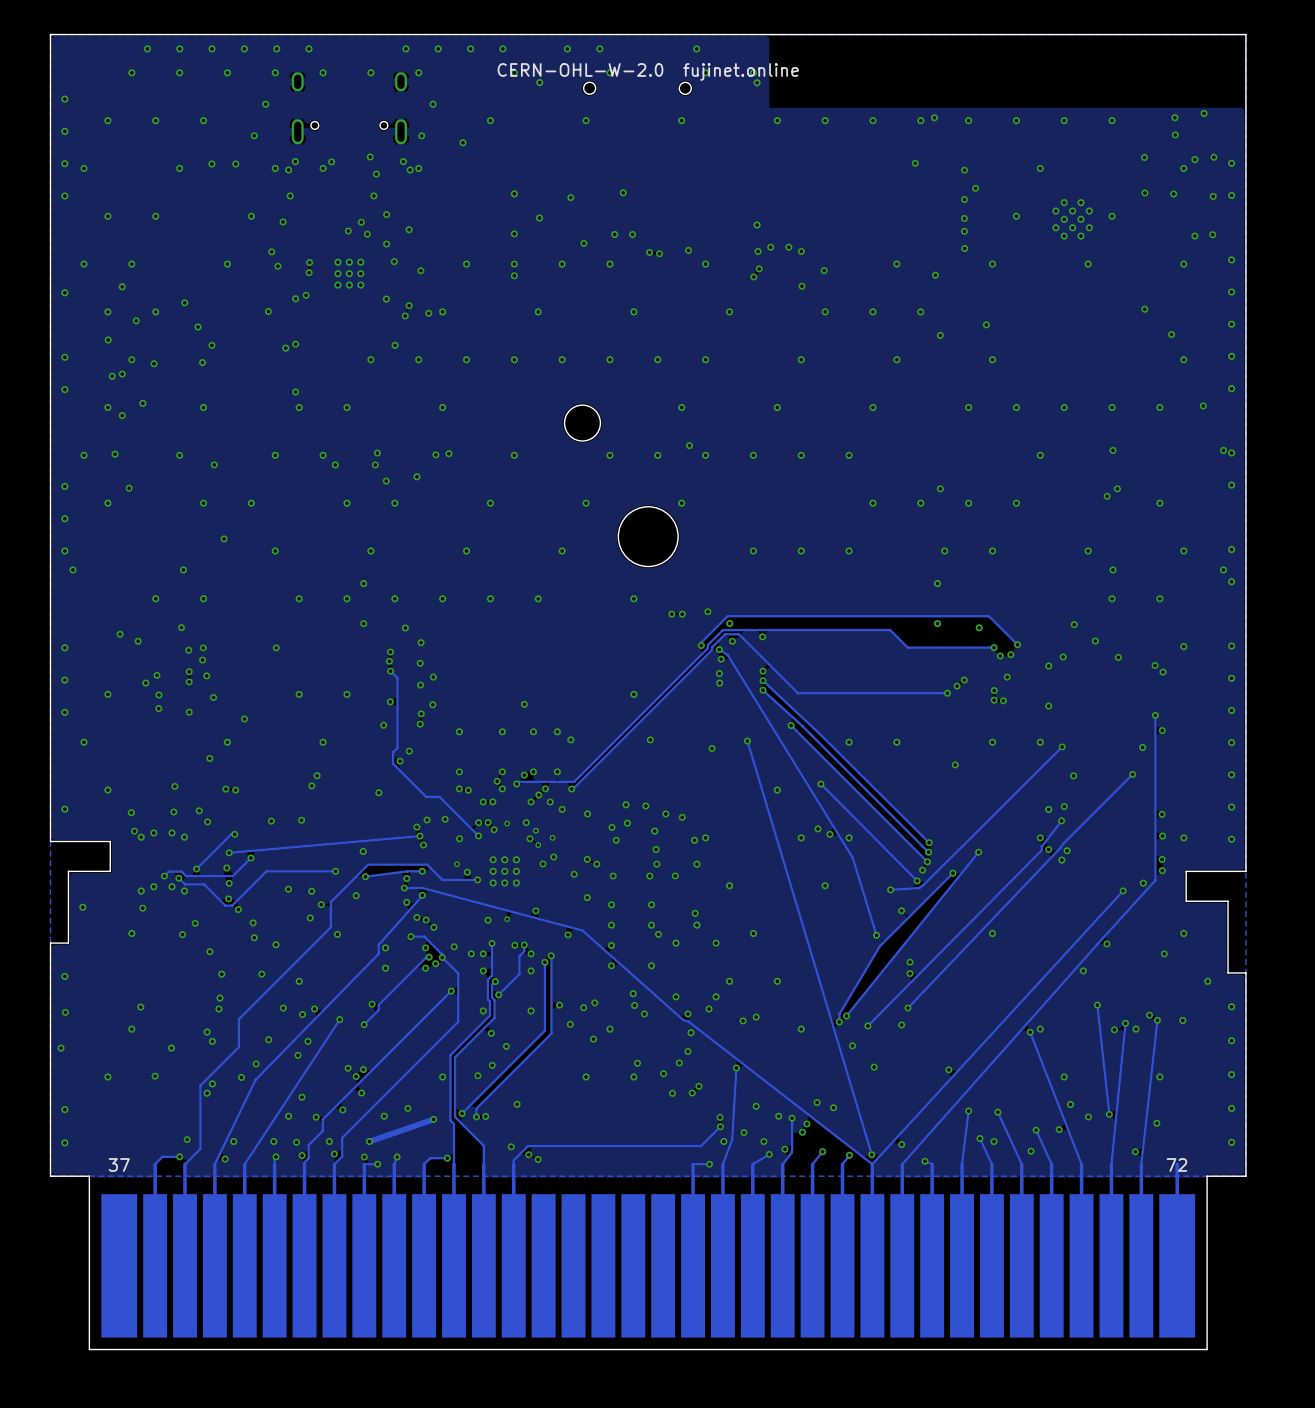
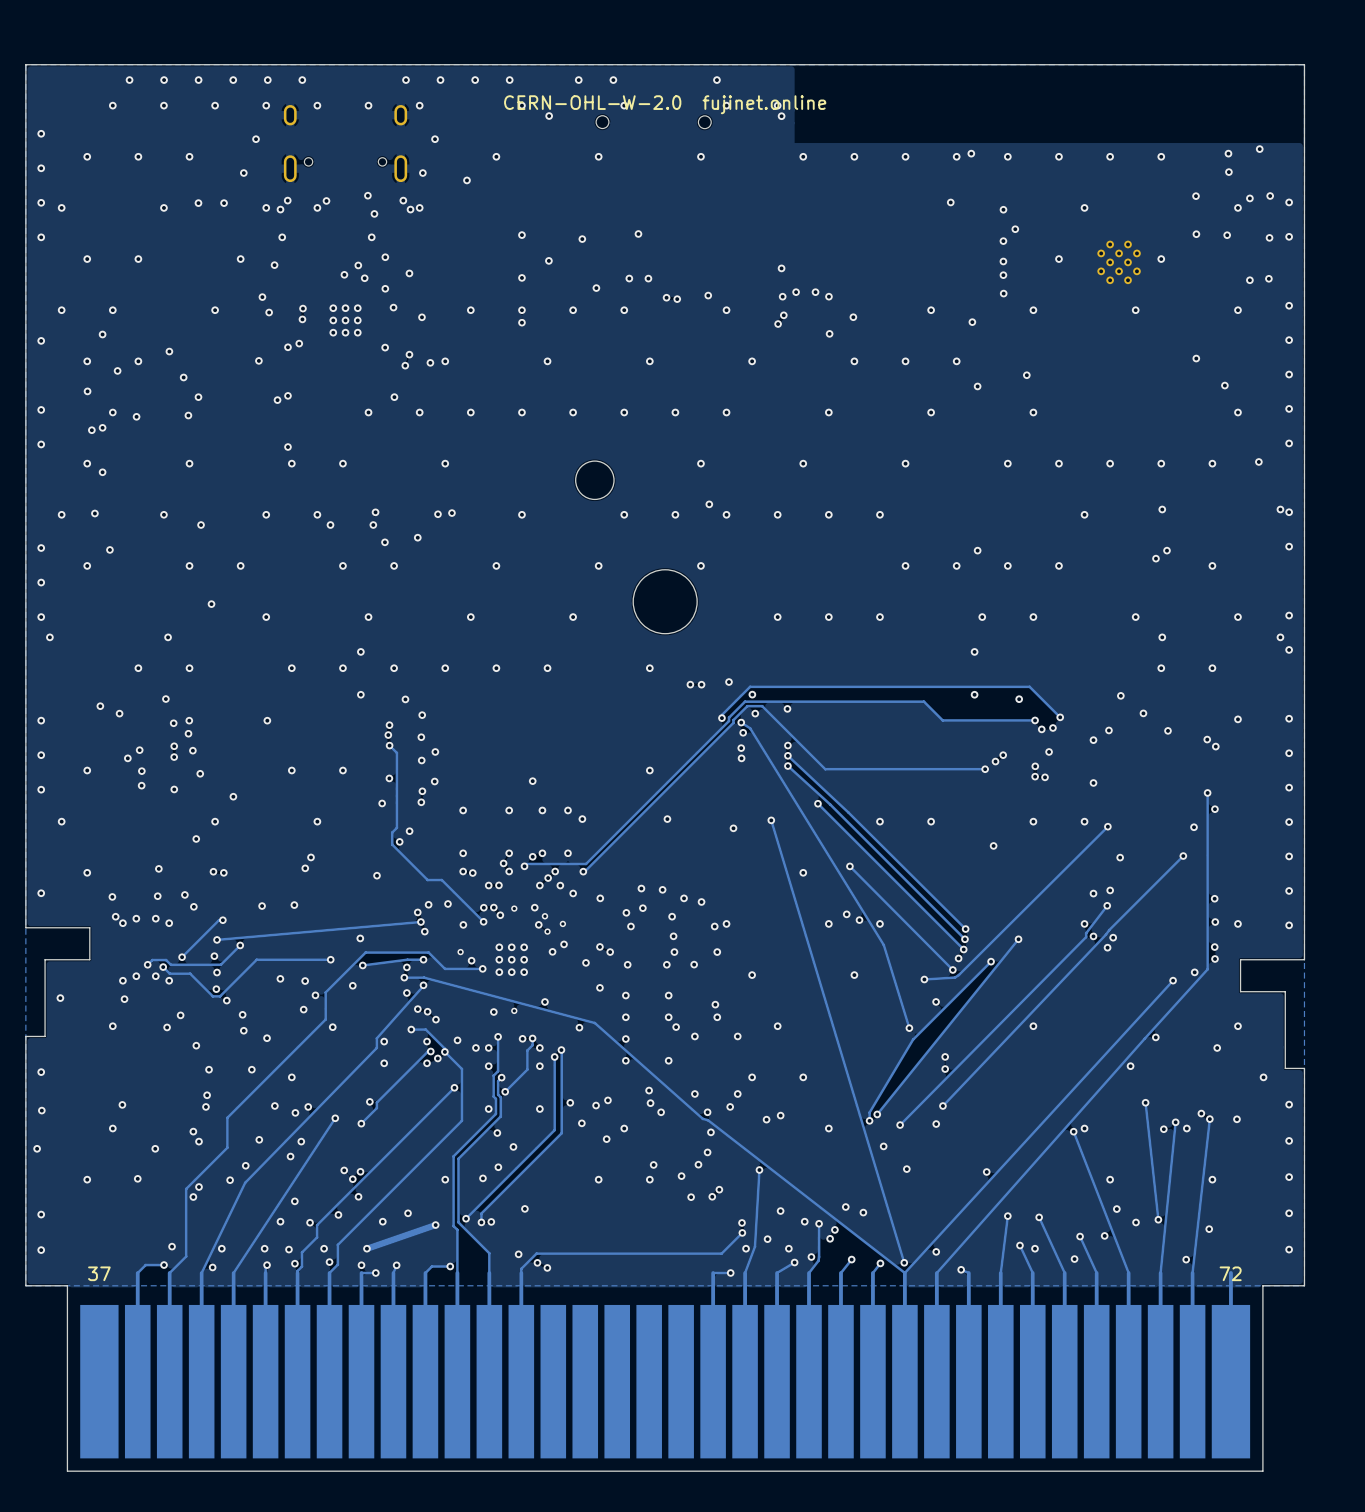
via: (142, 403) -> none

